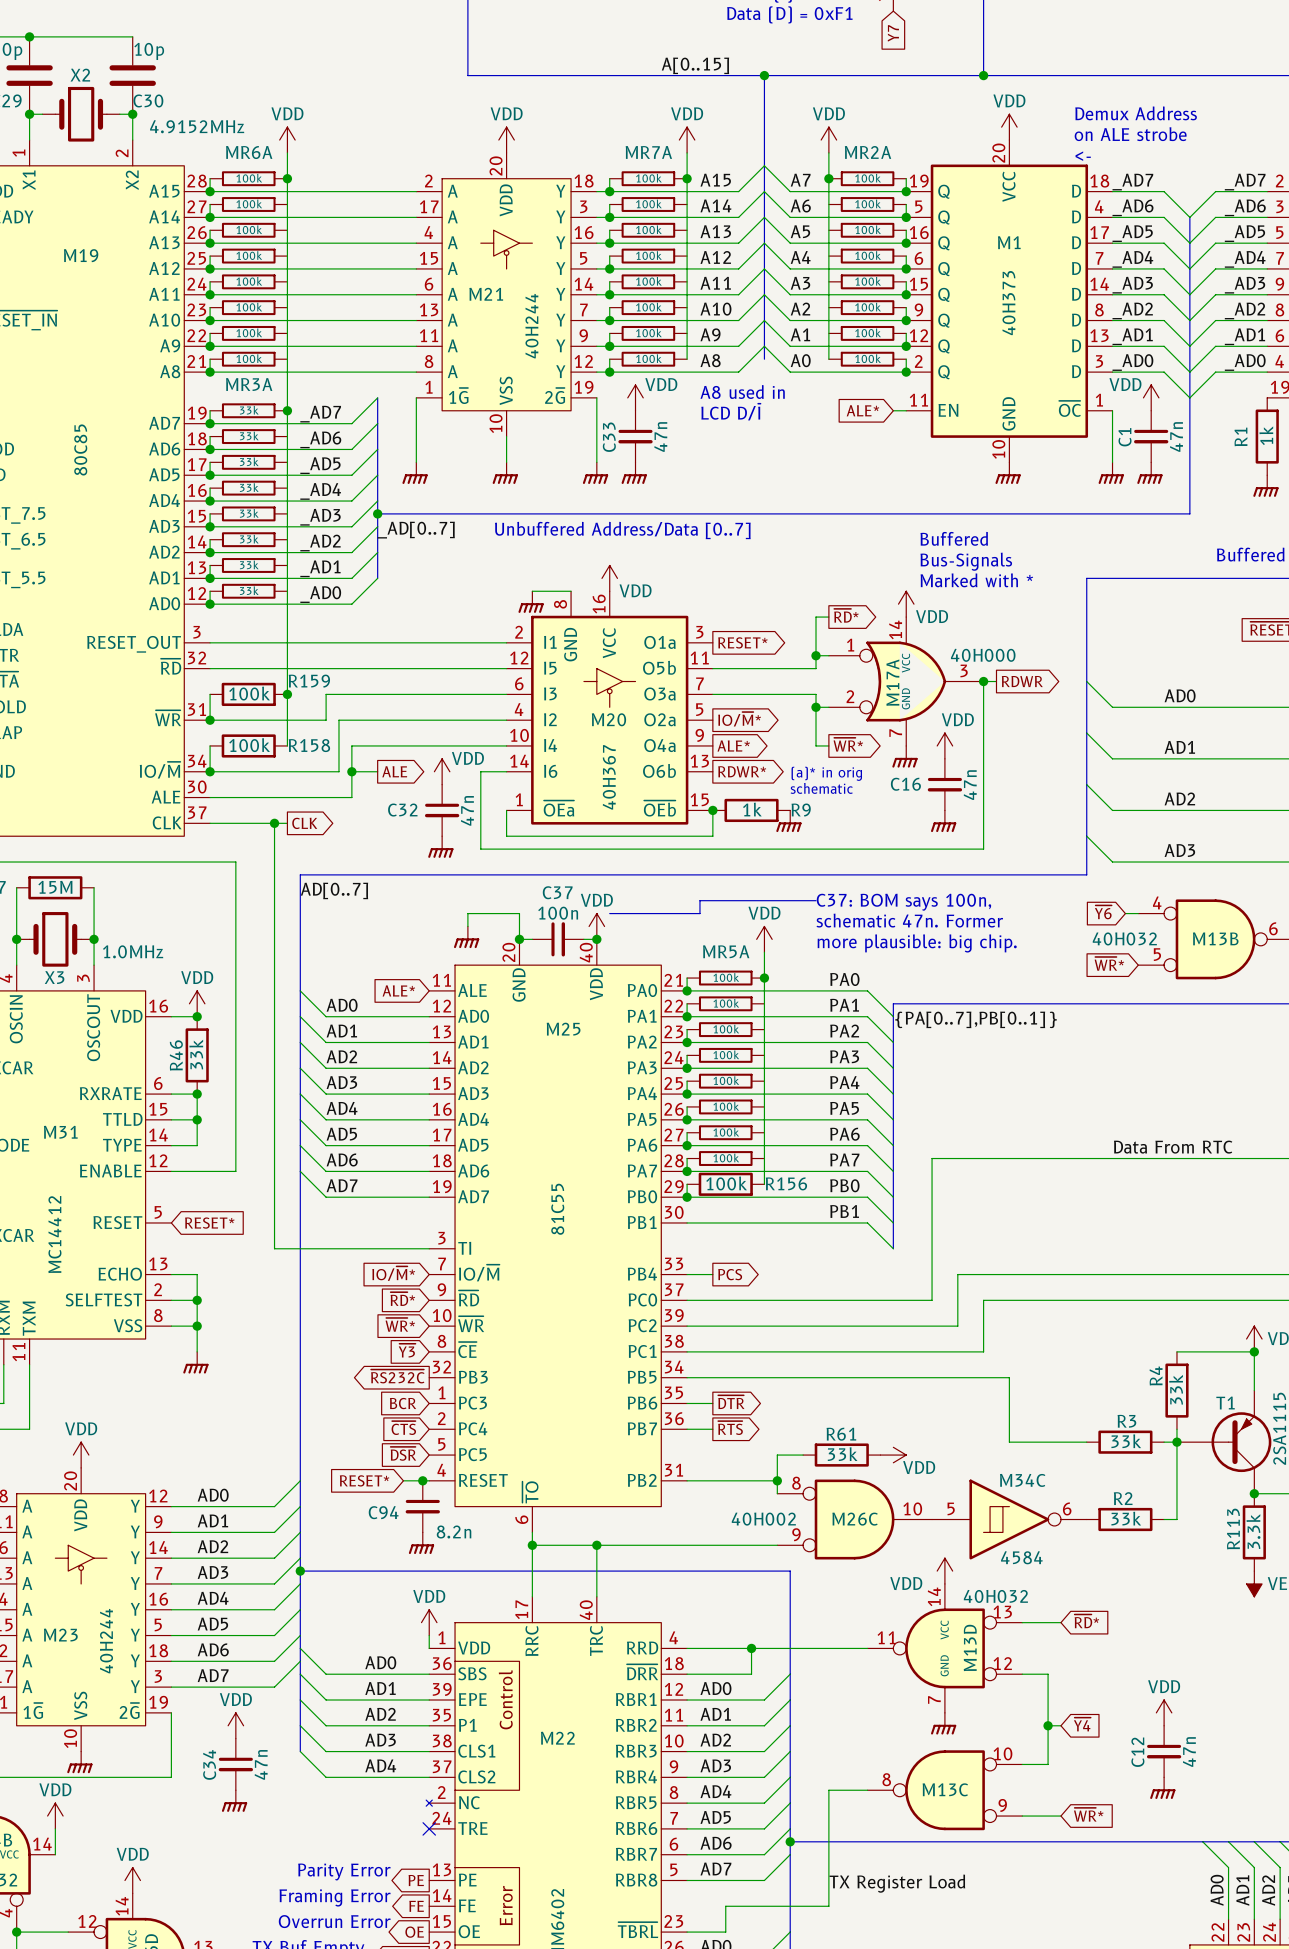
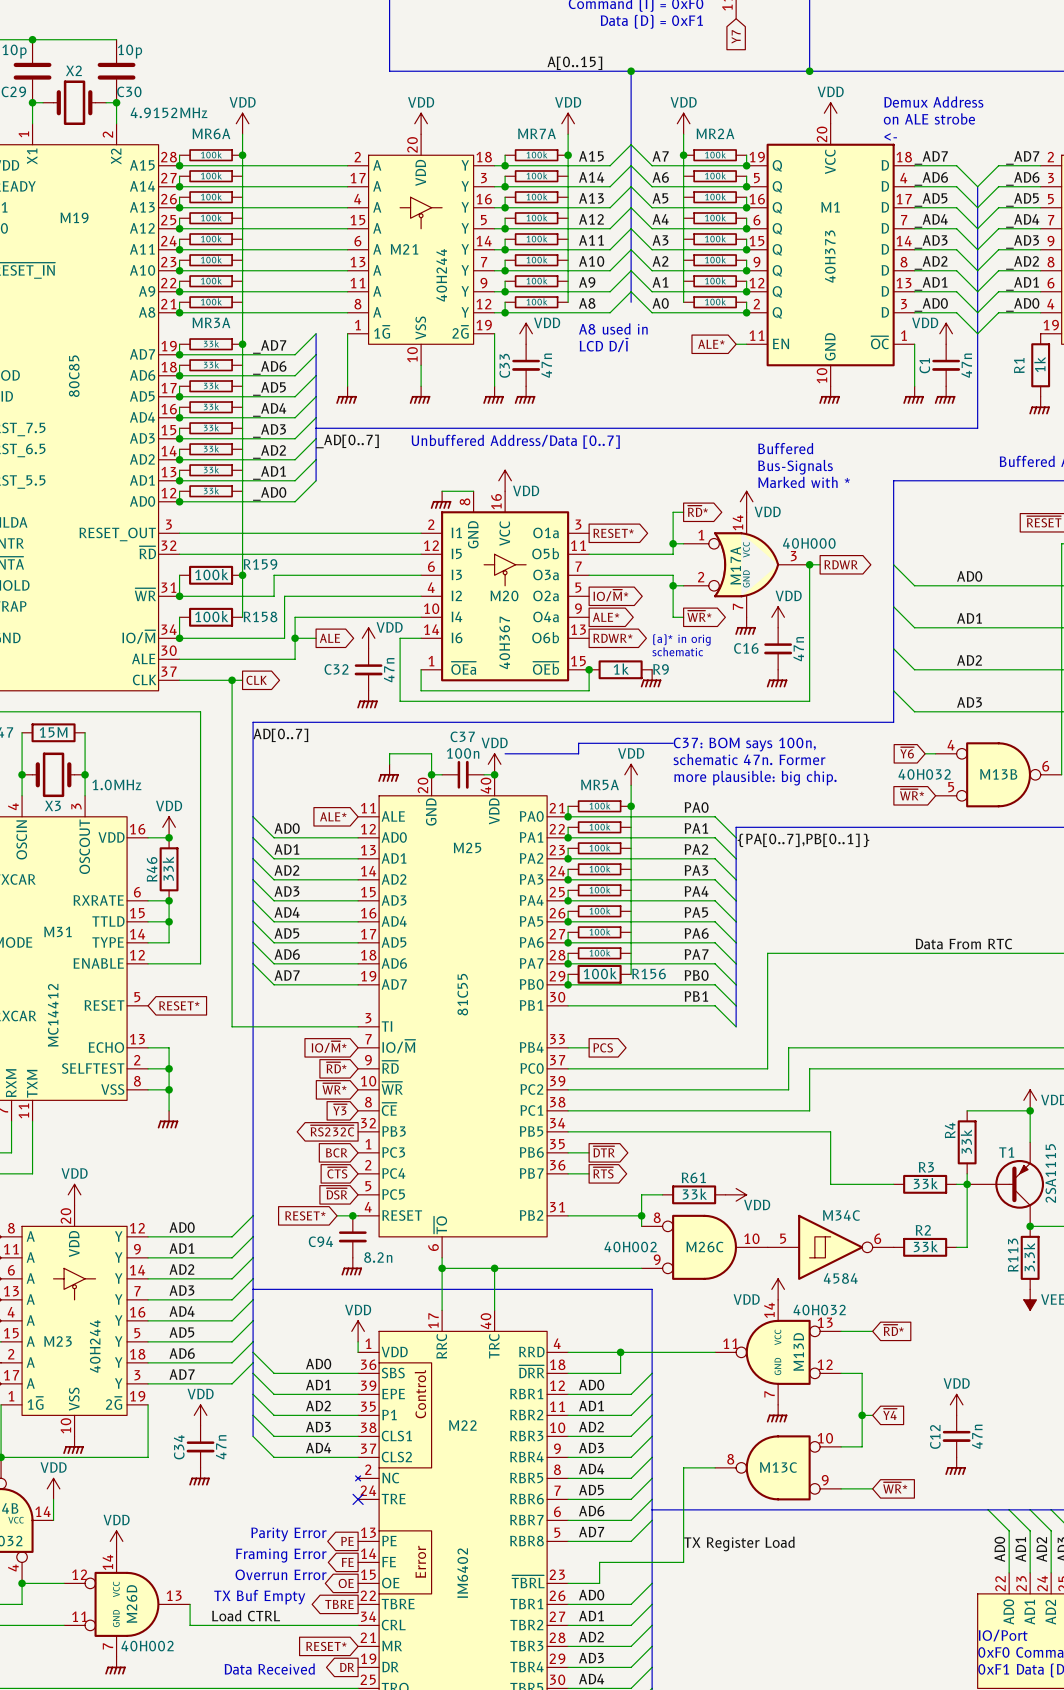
junction: (377, 513) -> none
junction: (300, 1571) -> none
junction: (790, 1841) -> none

